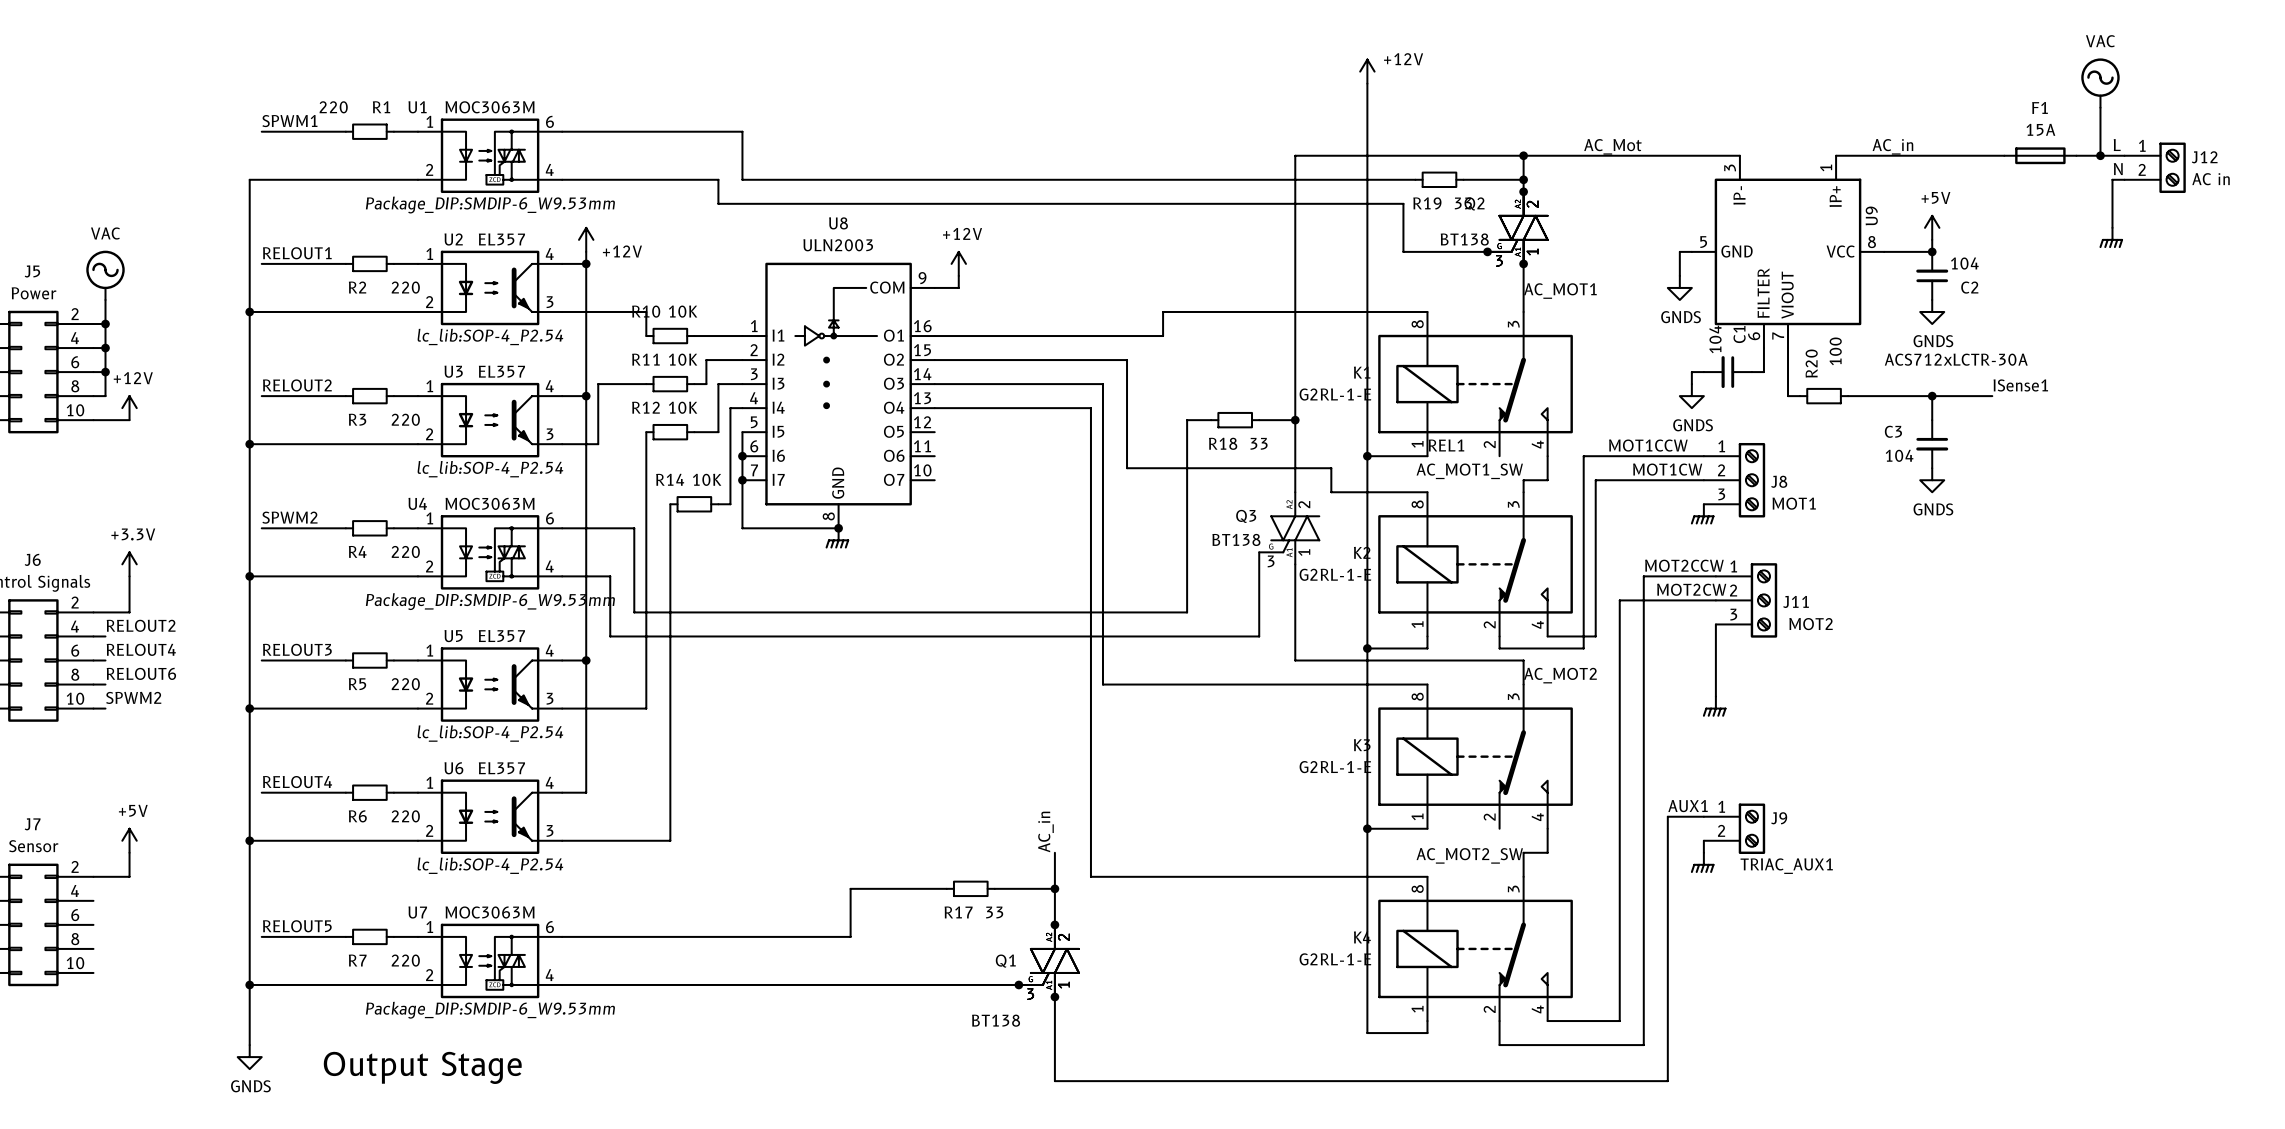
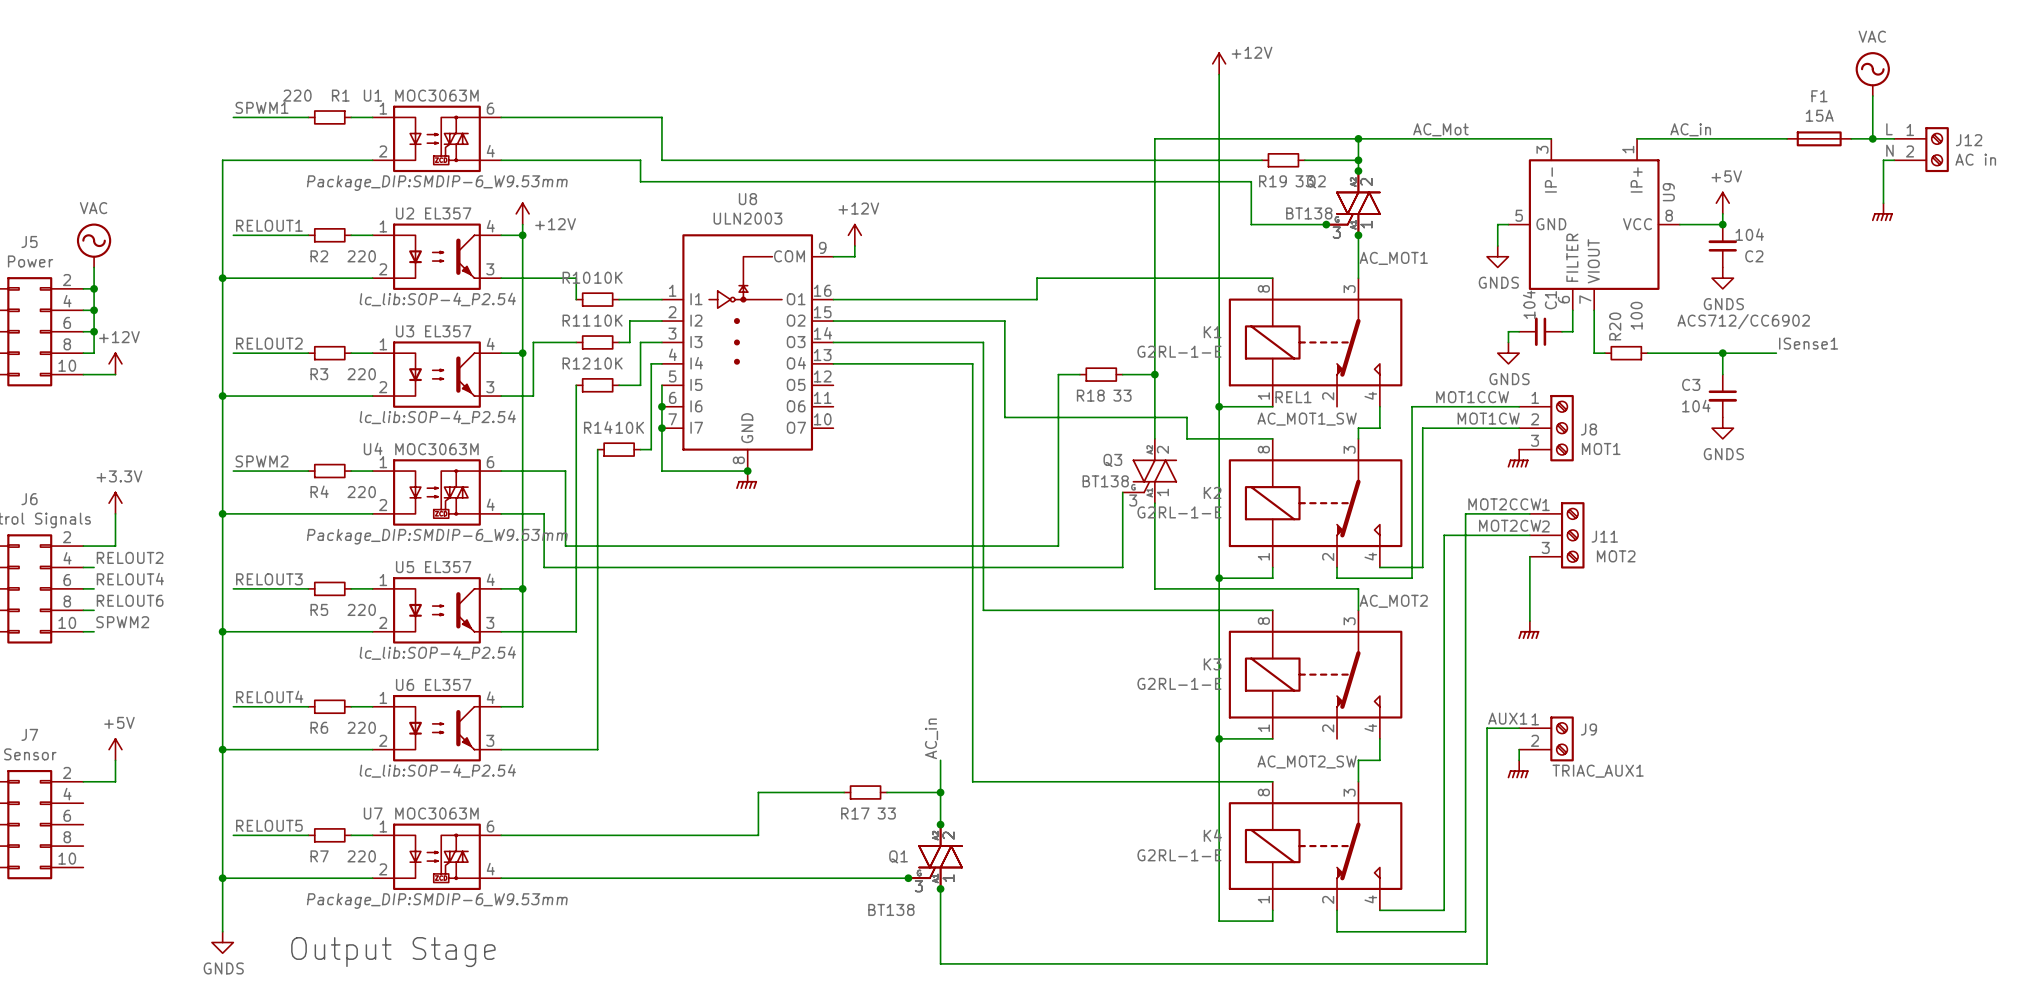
U9 value: ACS712xLCTR-30A (1956, 359) -> ACS712/CC6902 (1743, 321)

